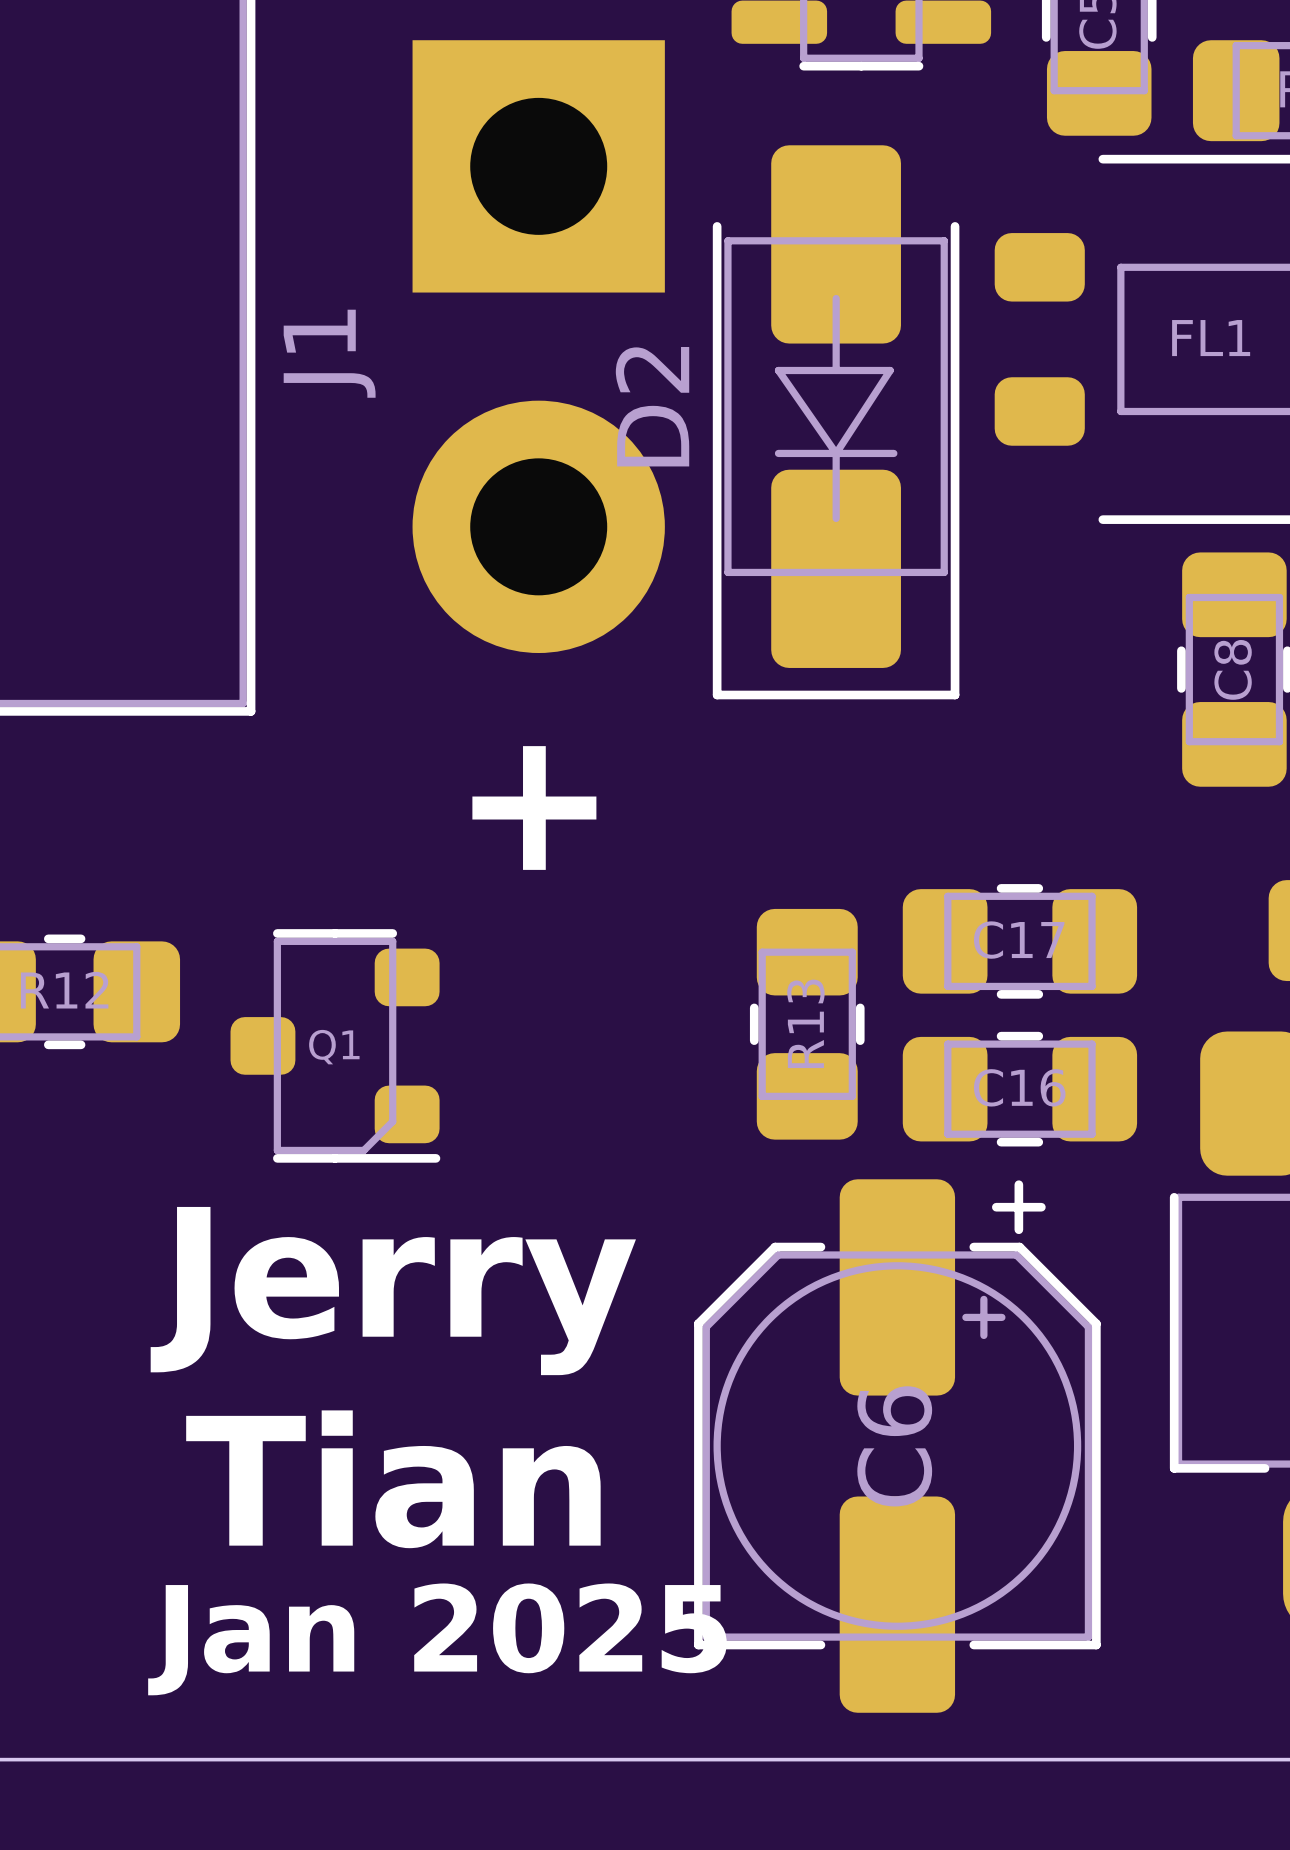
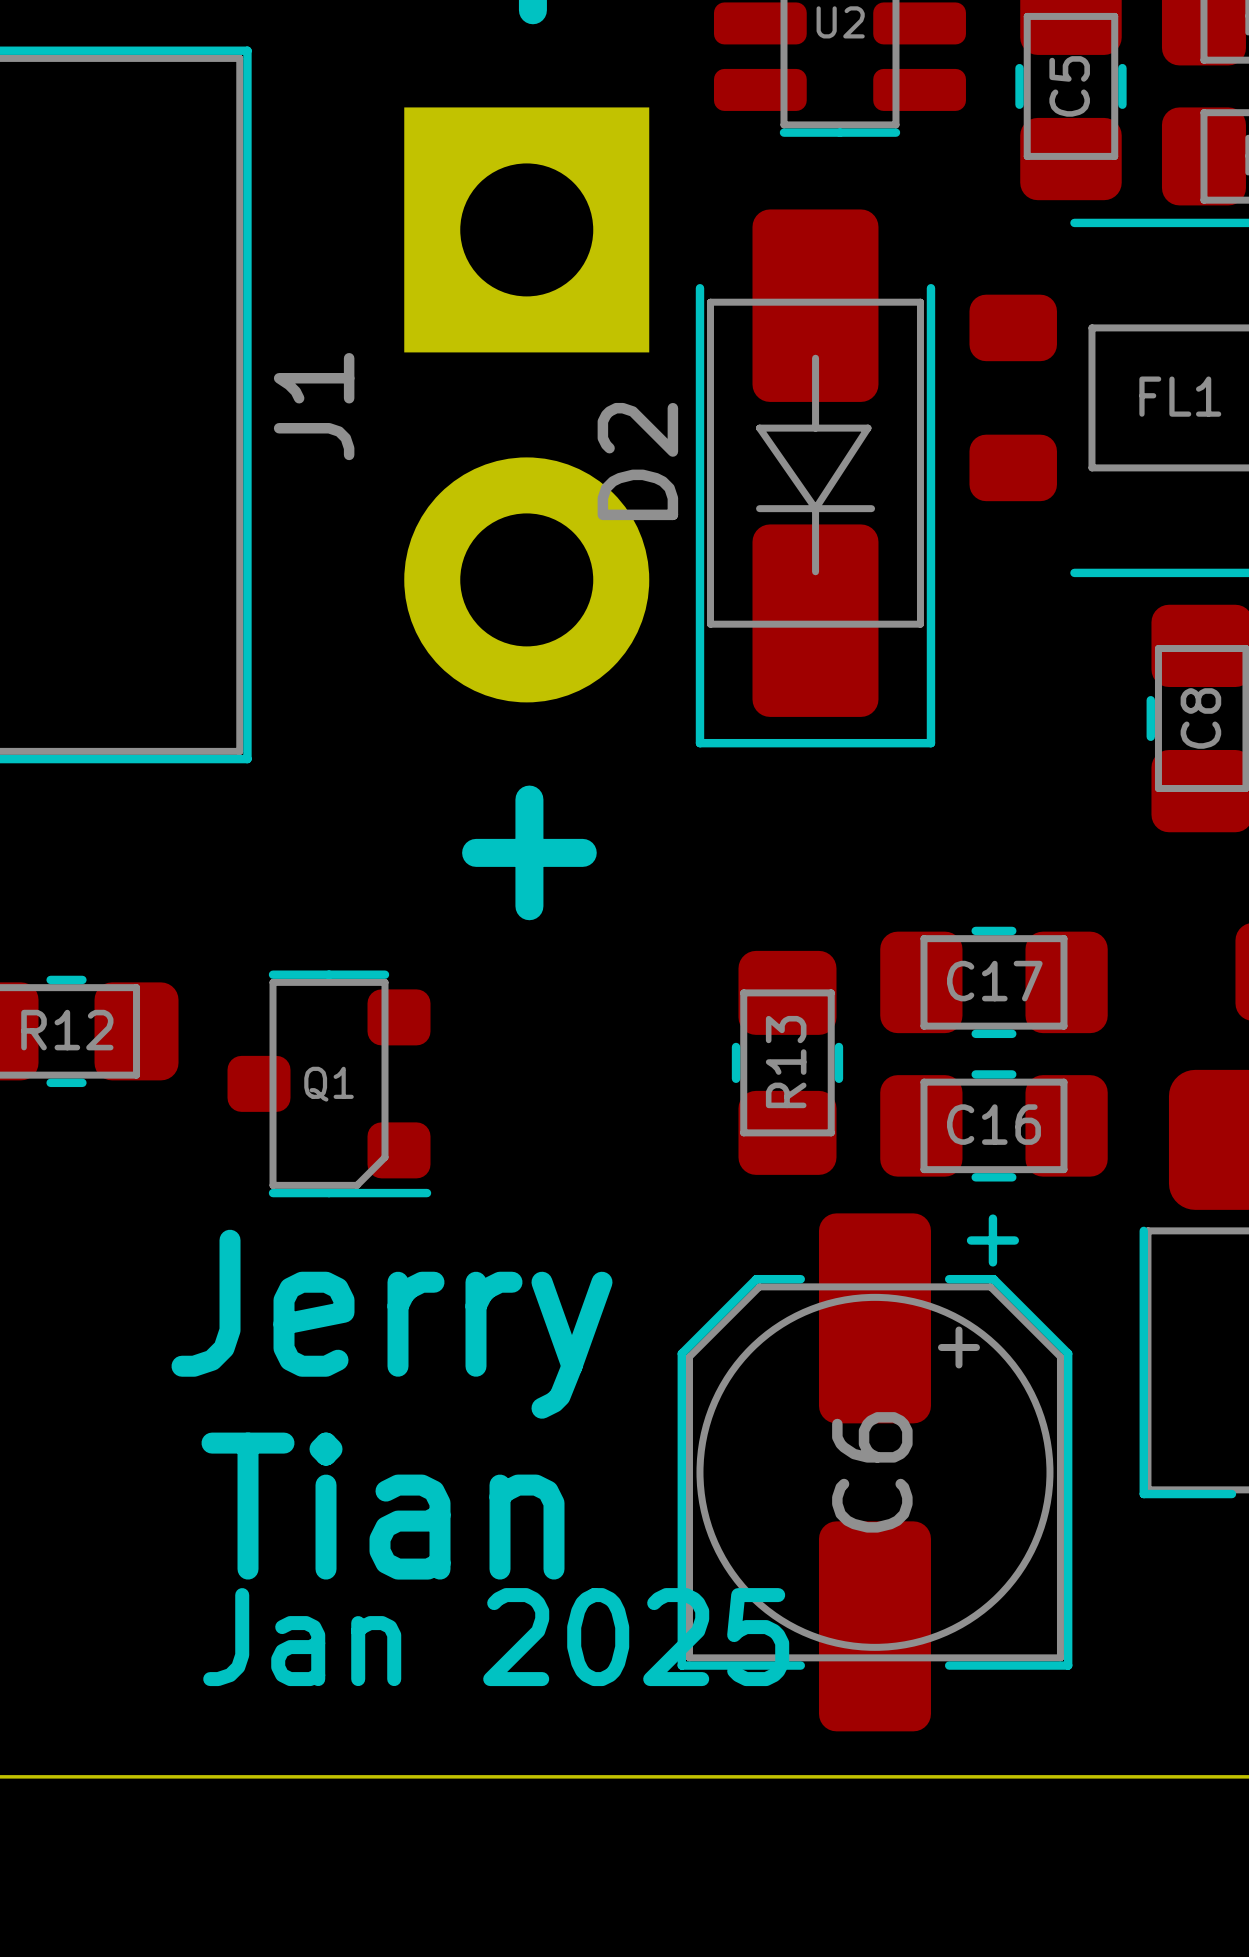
text position: Jan 2025 (437, 1639) -> Jan 2025 (496, 1637)

